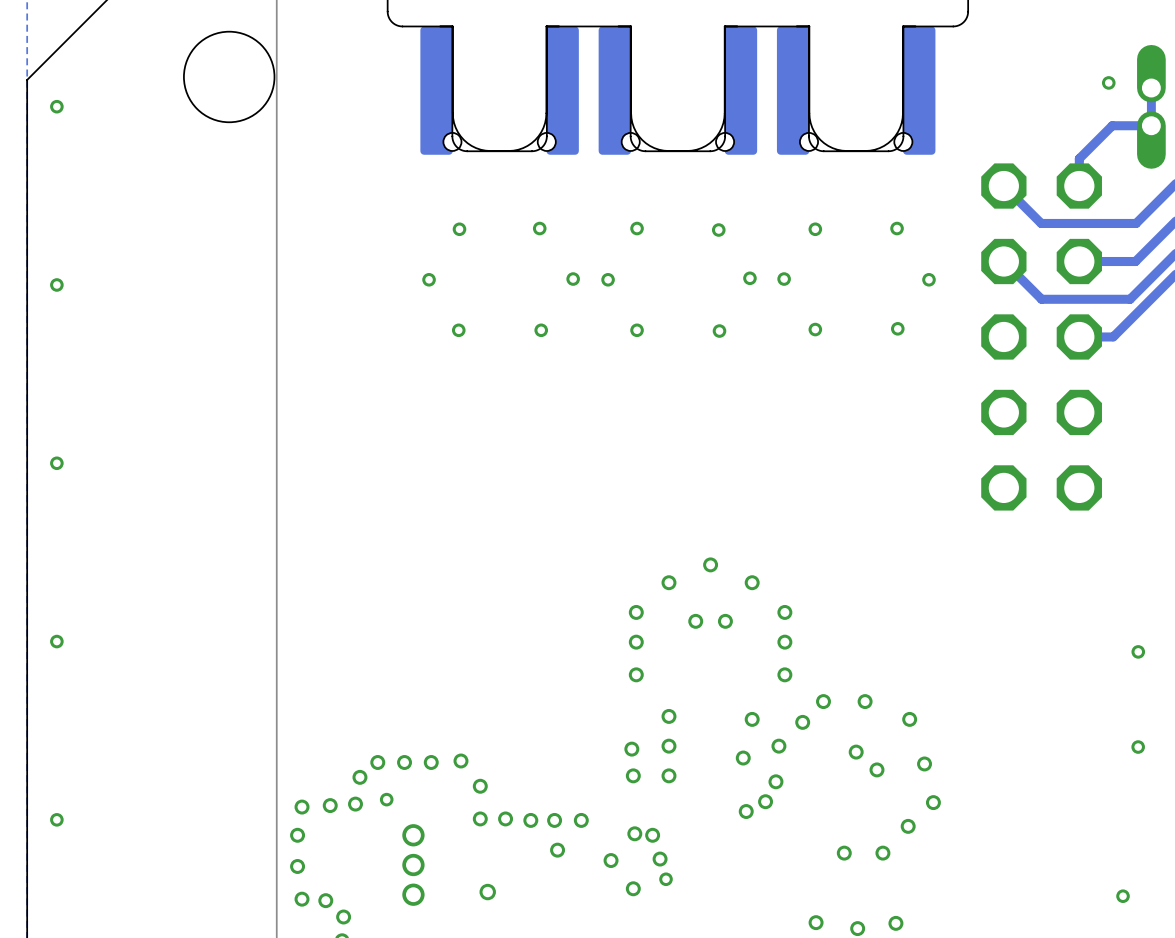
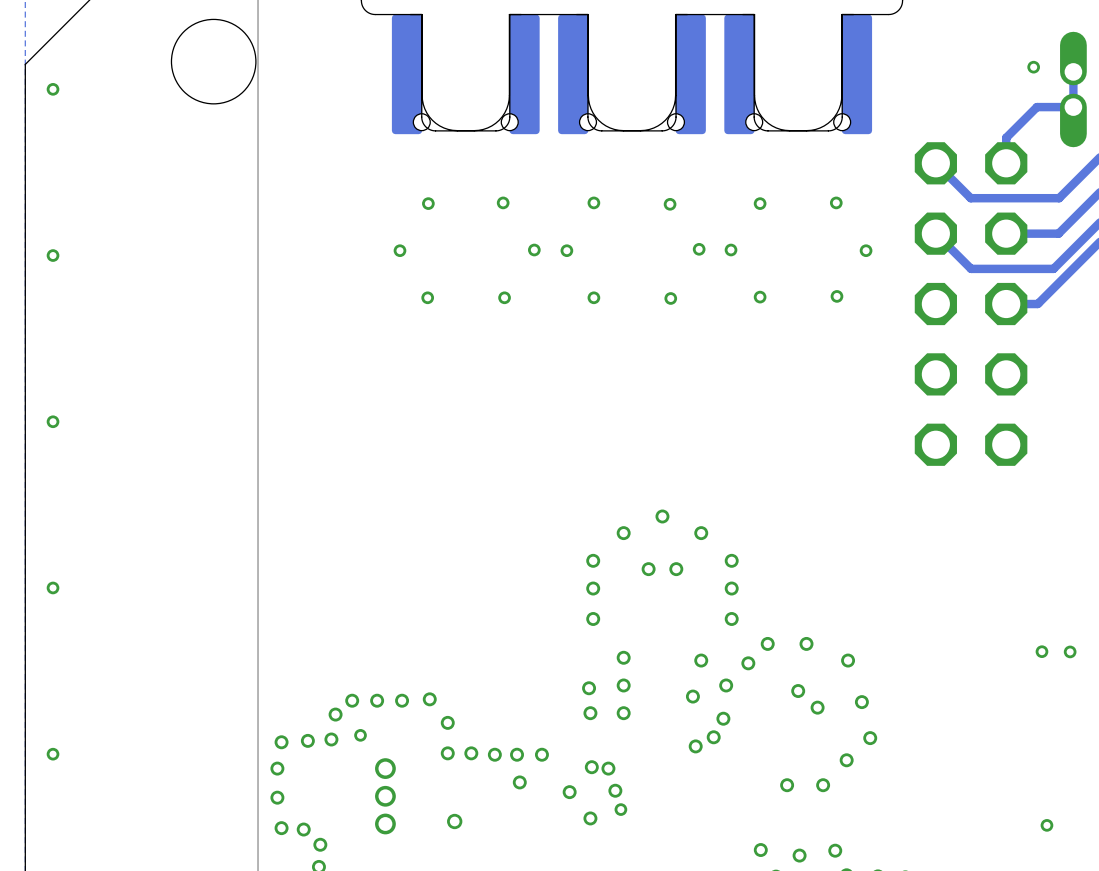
via: (1138, 651) -> none
via: none -> (1041, 651)
via: none -> (1070, 651)
via: (1138, 747) -> none

